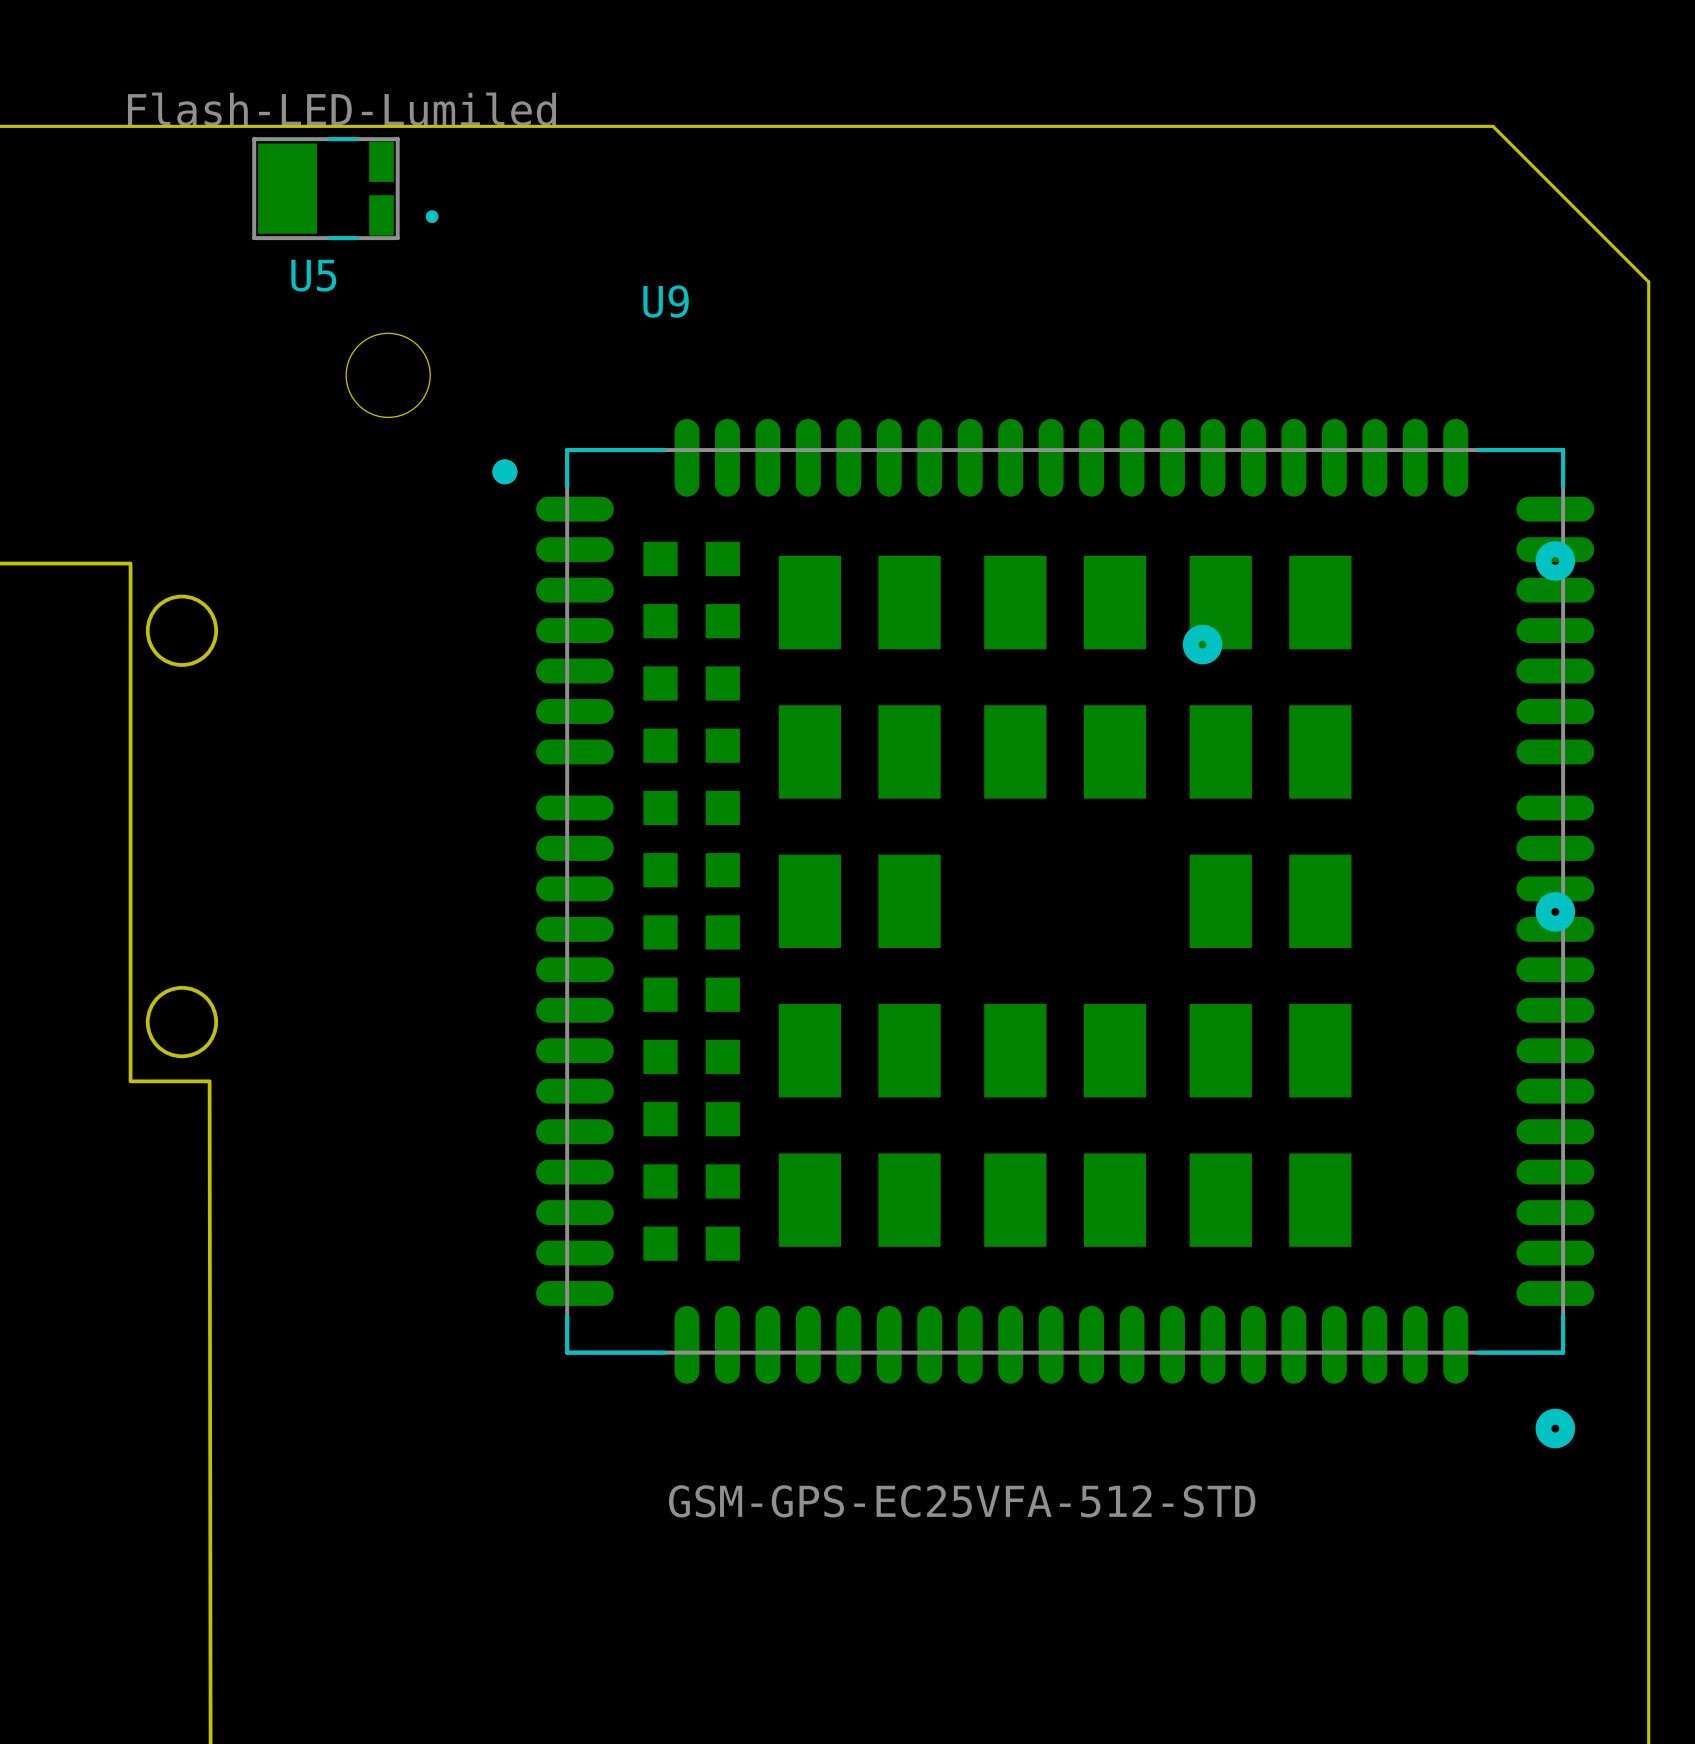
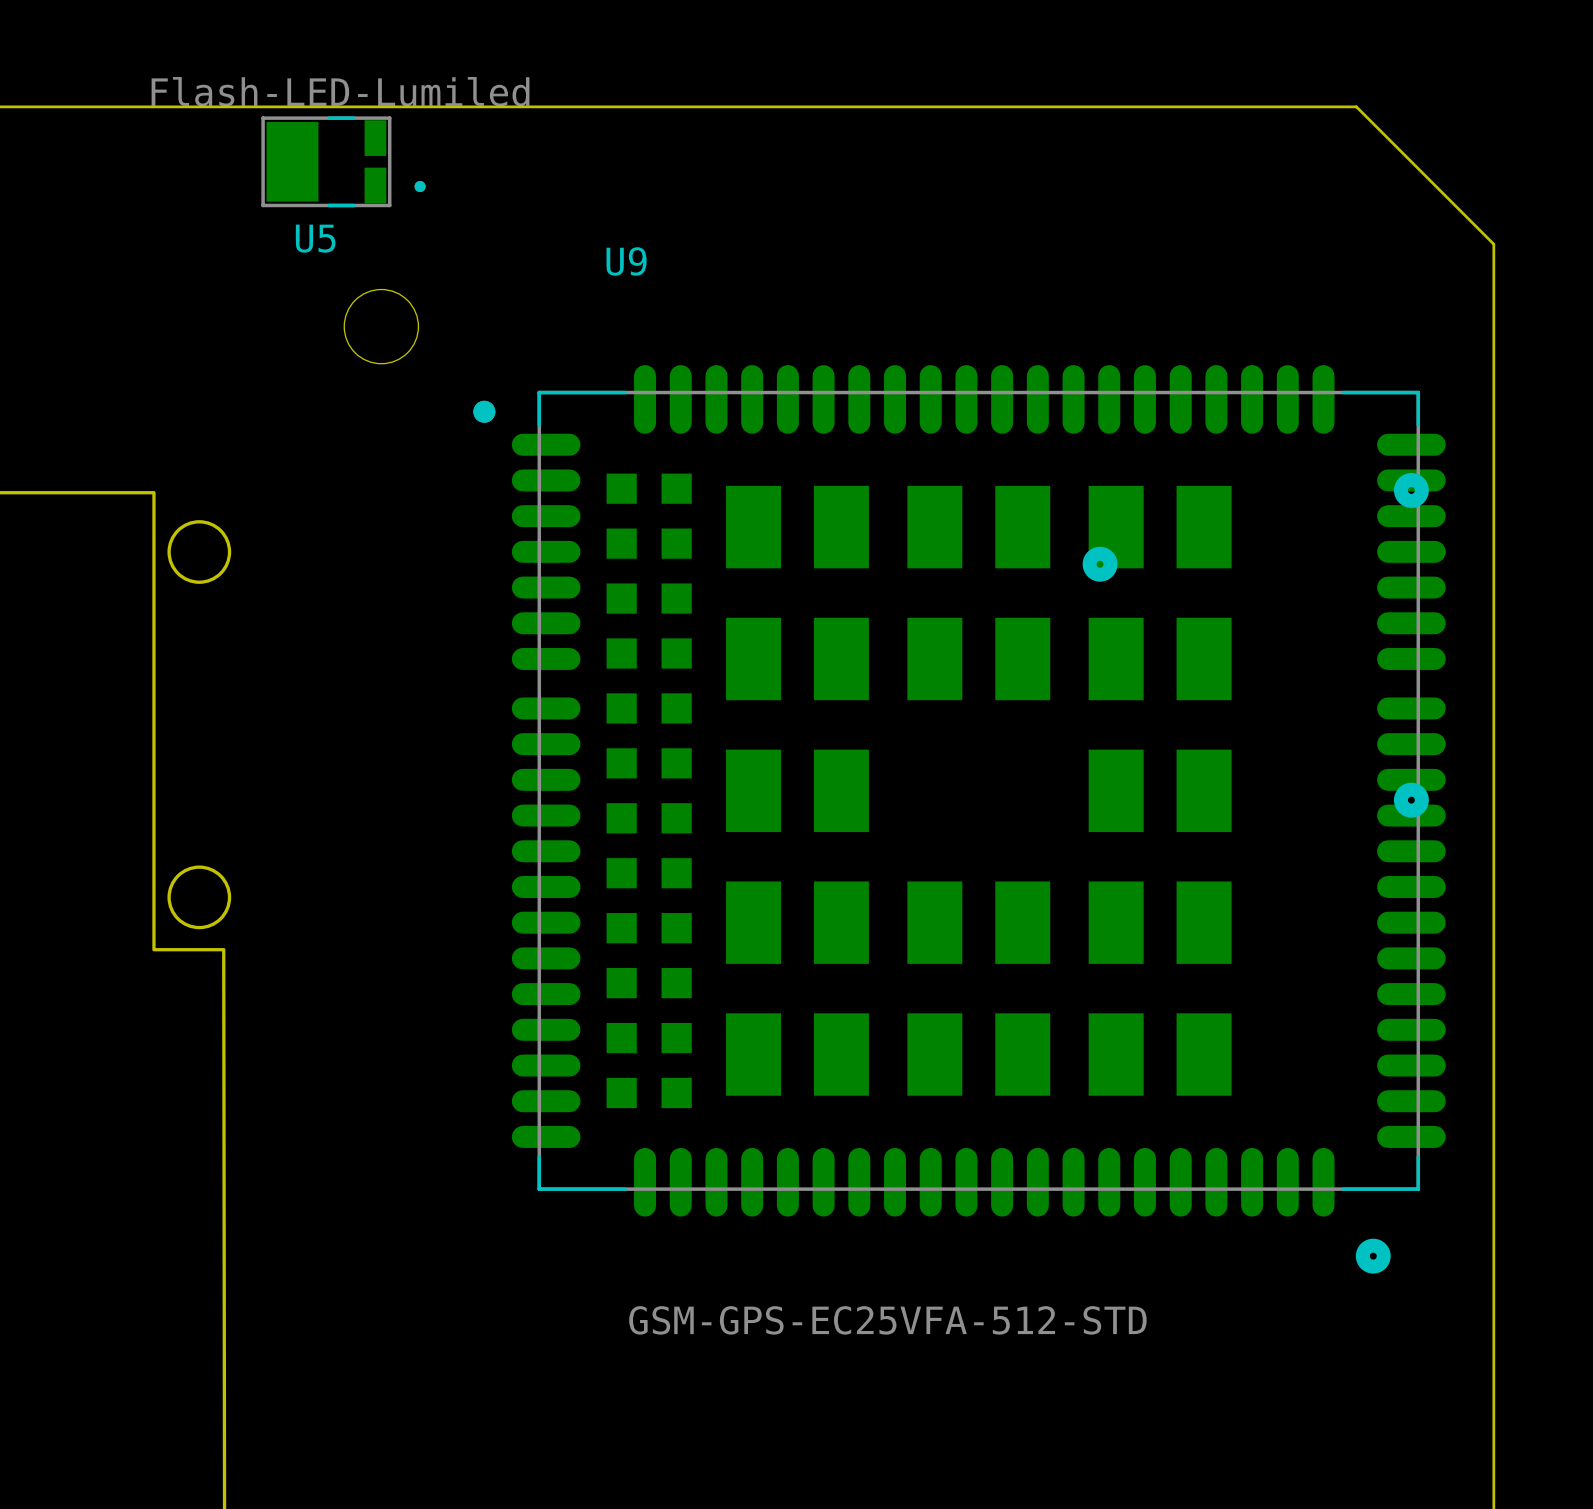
part position: (1555, 1428) -> (1373, 1256)

